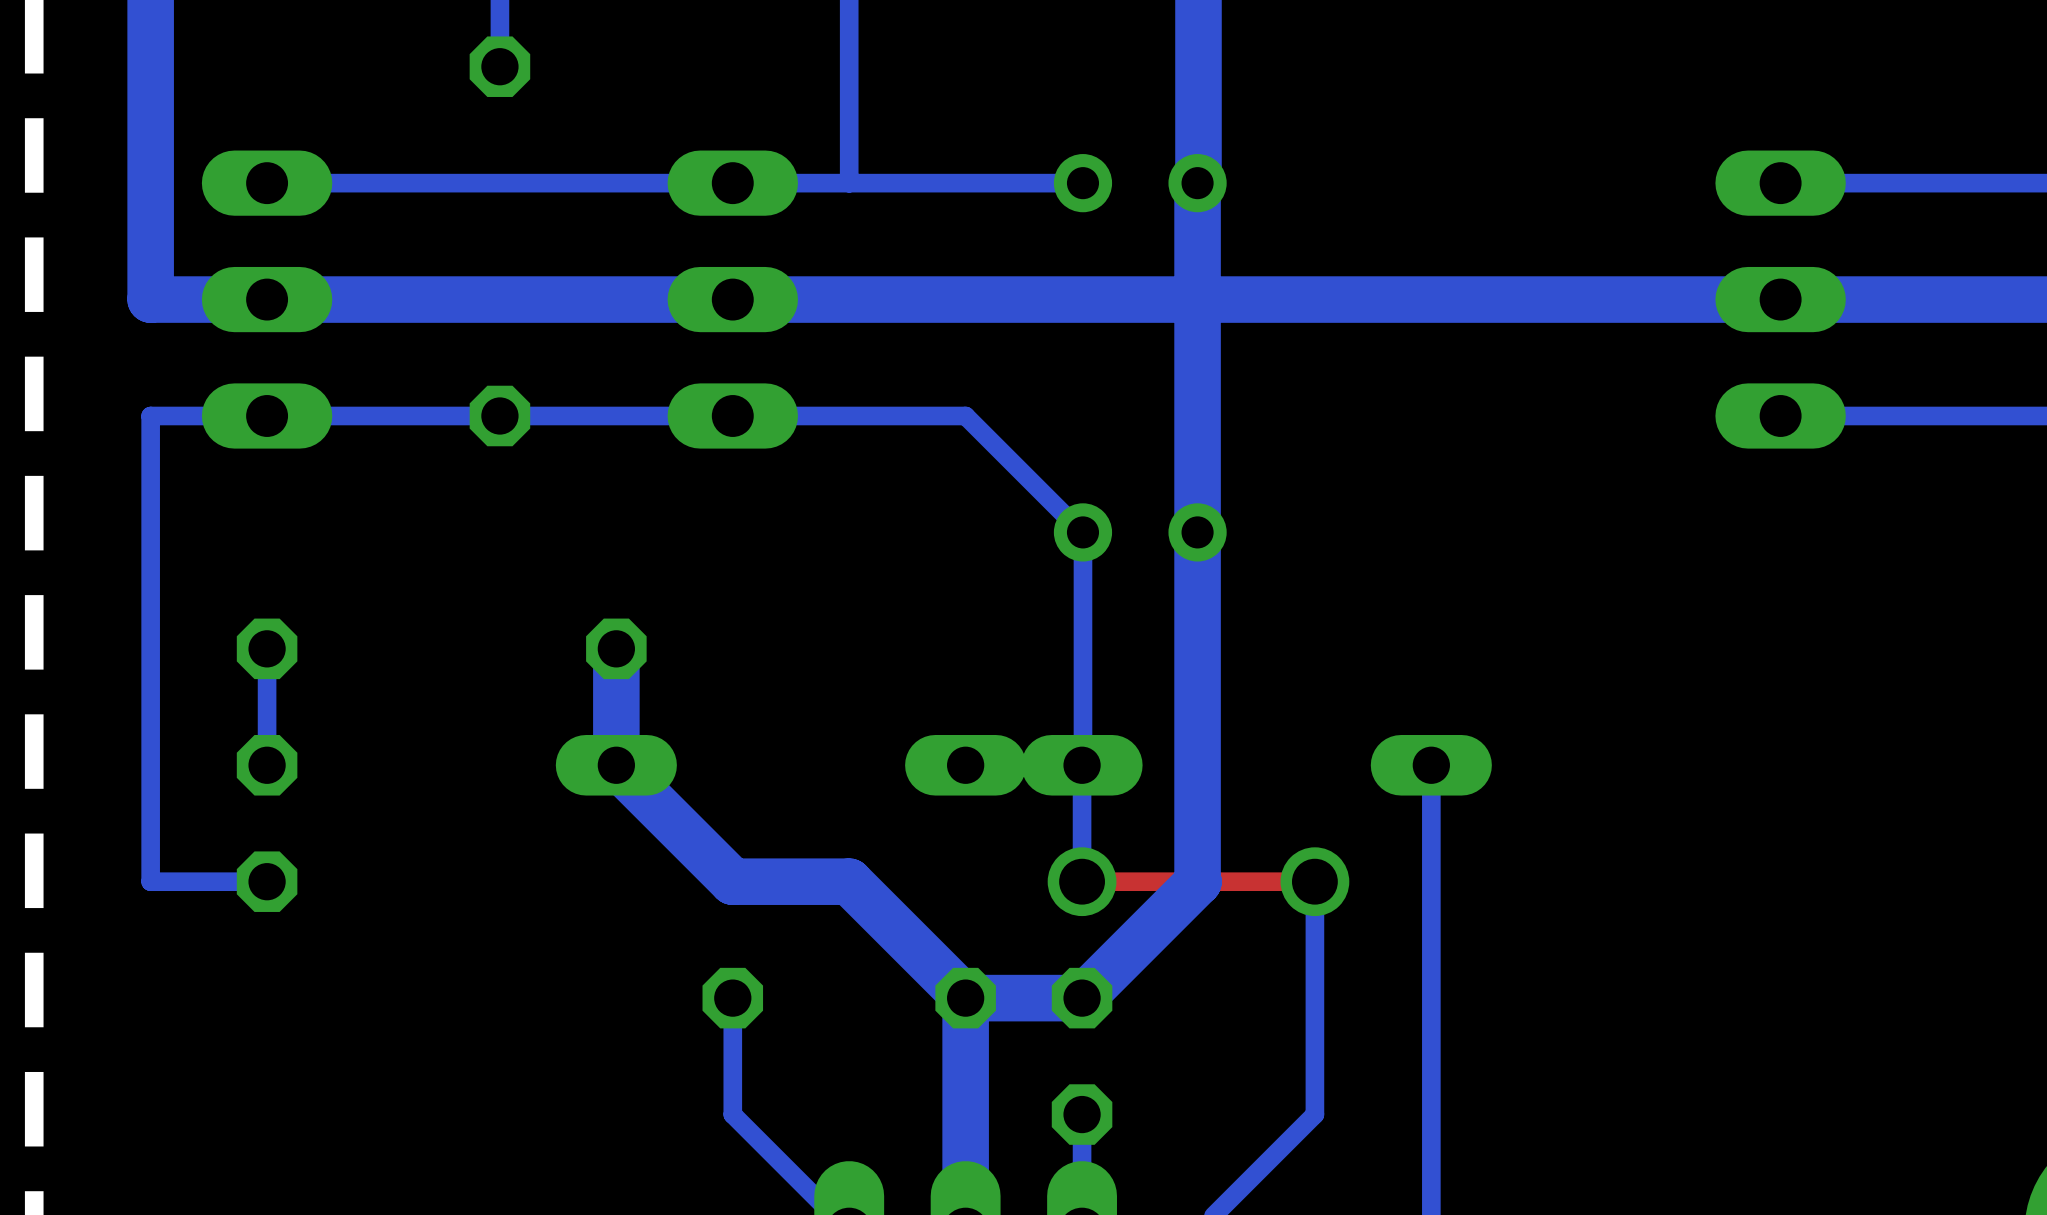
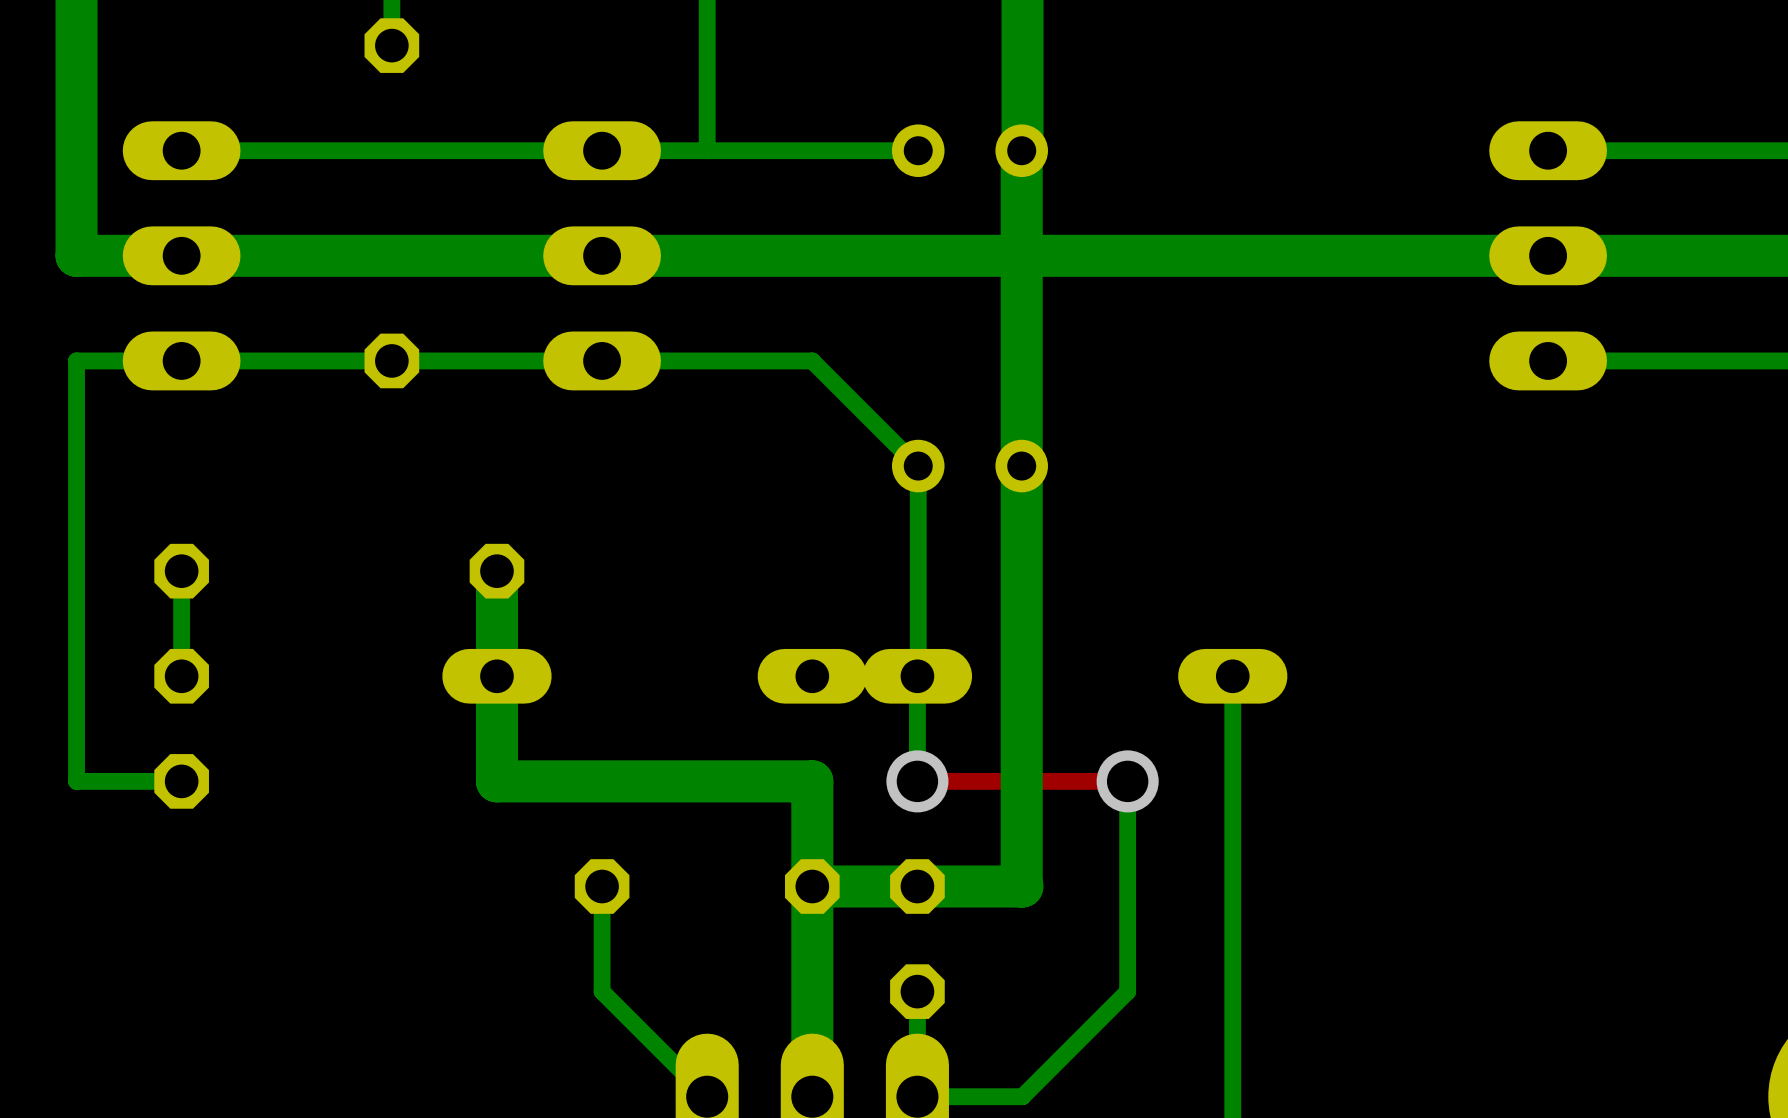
bottom track: (616, 765) (732, 881) -> (496, 676) (496, 781) (602, 781)
bottom track: (1197, 880) (1082, 998) -> (1021, 780) (1021, 886)
bottom track: (849, 881) (965, 998) -> (707, 781) (812, 781) (812, 886)
bottom track: none -> (1022, 886) (917, 886)

